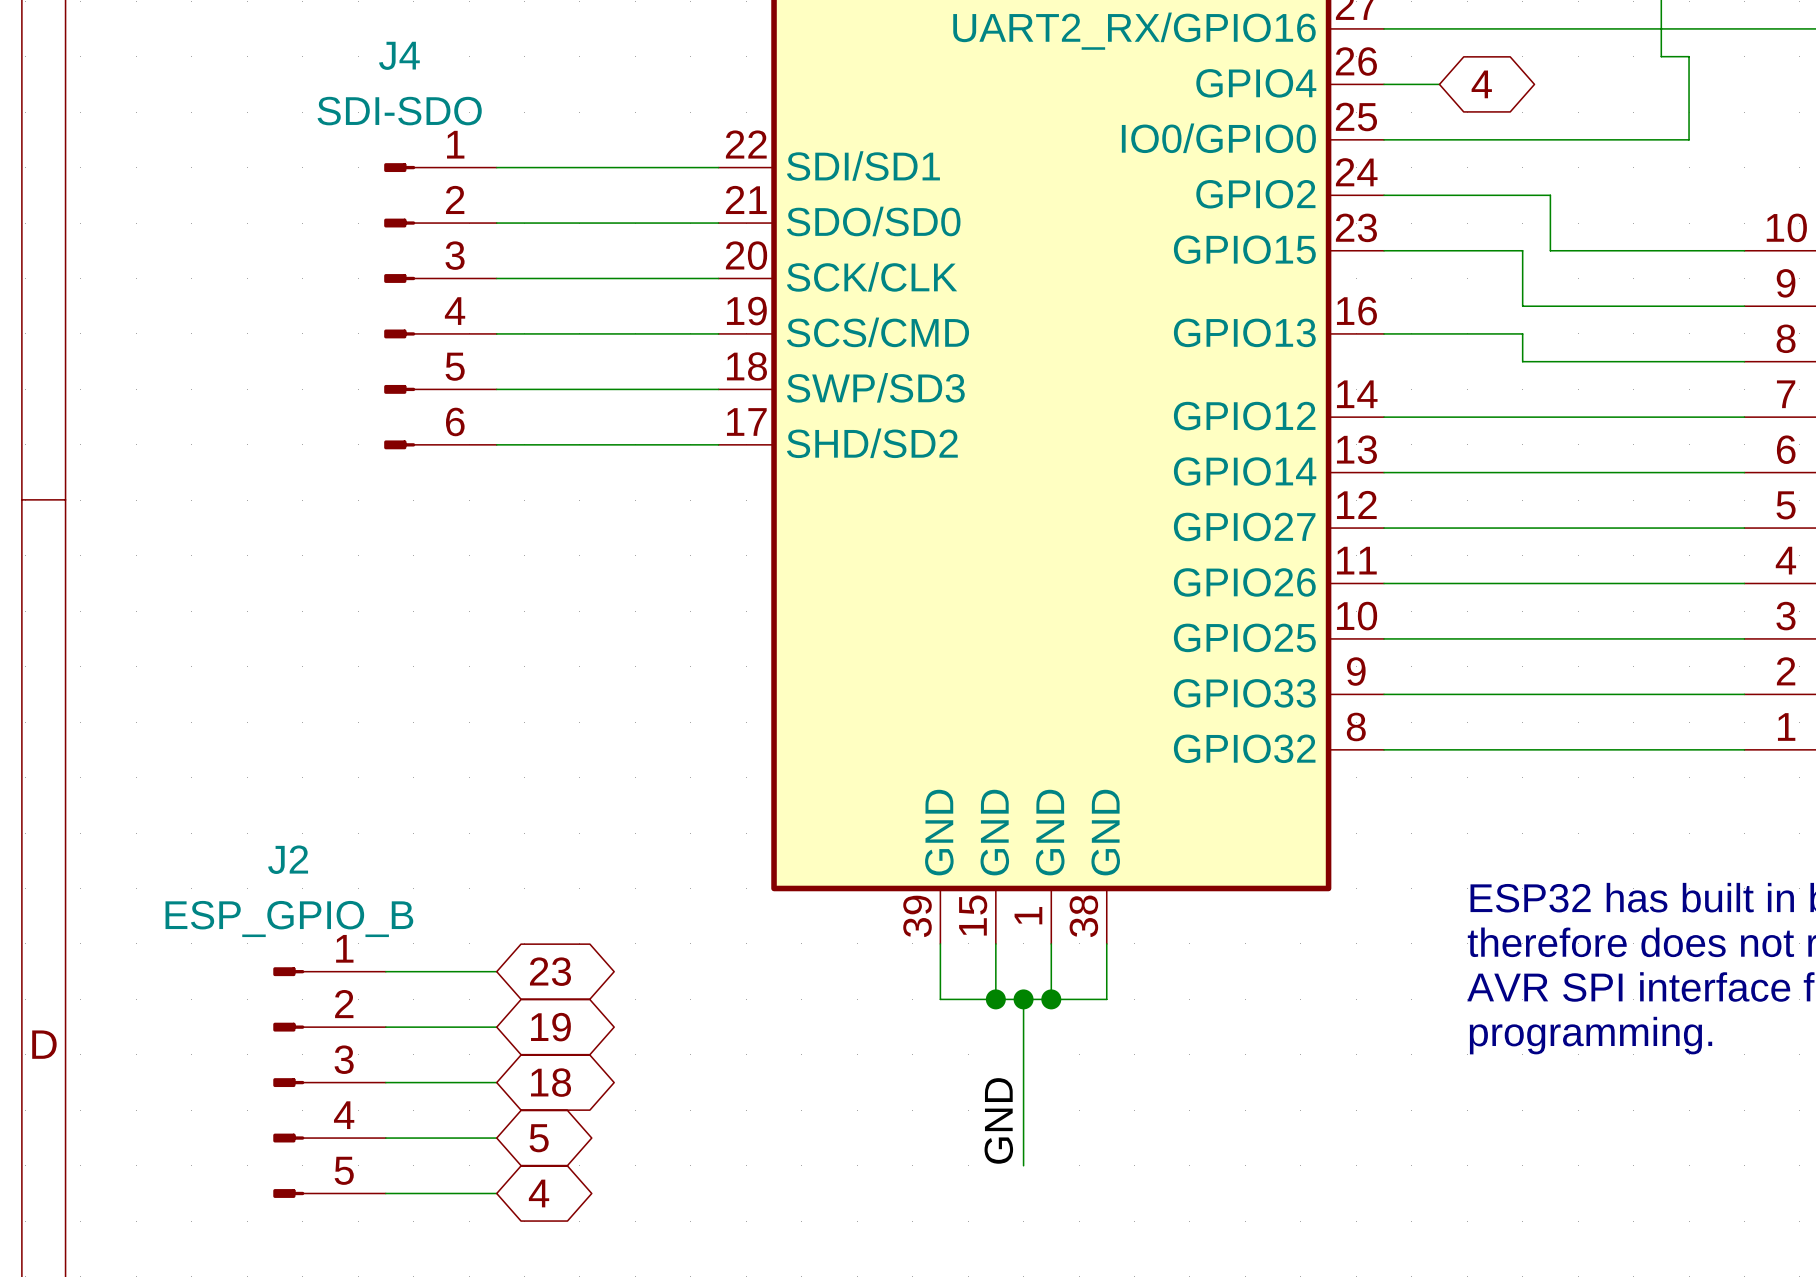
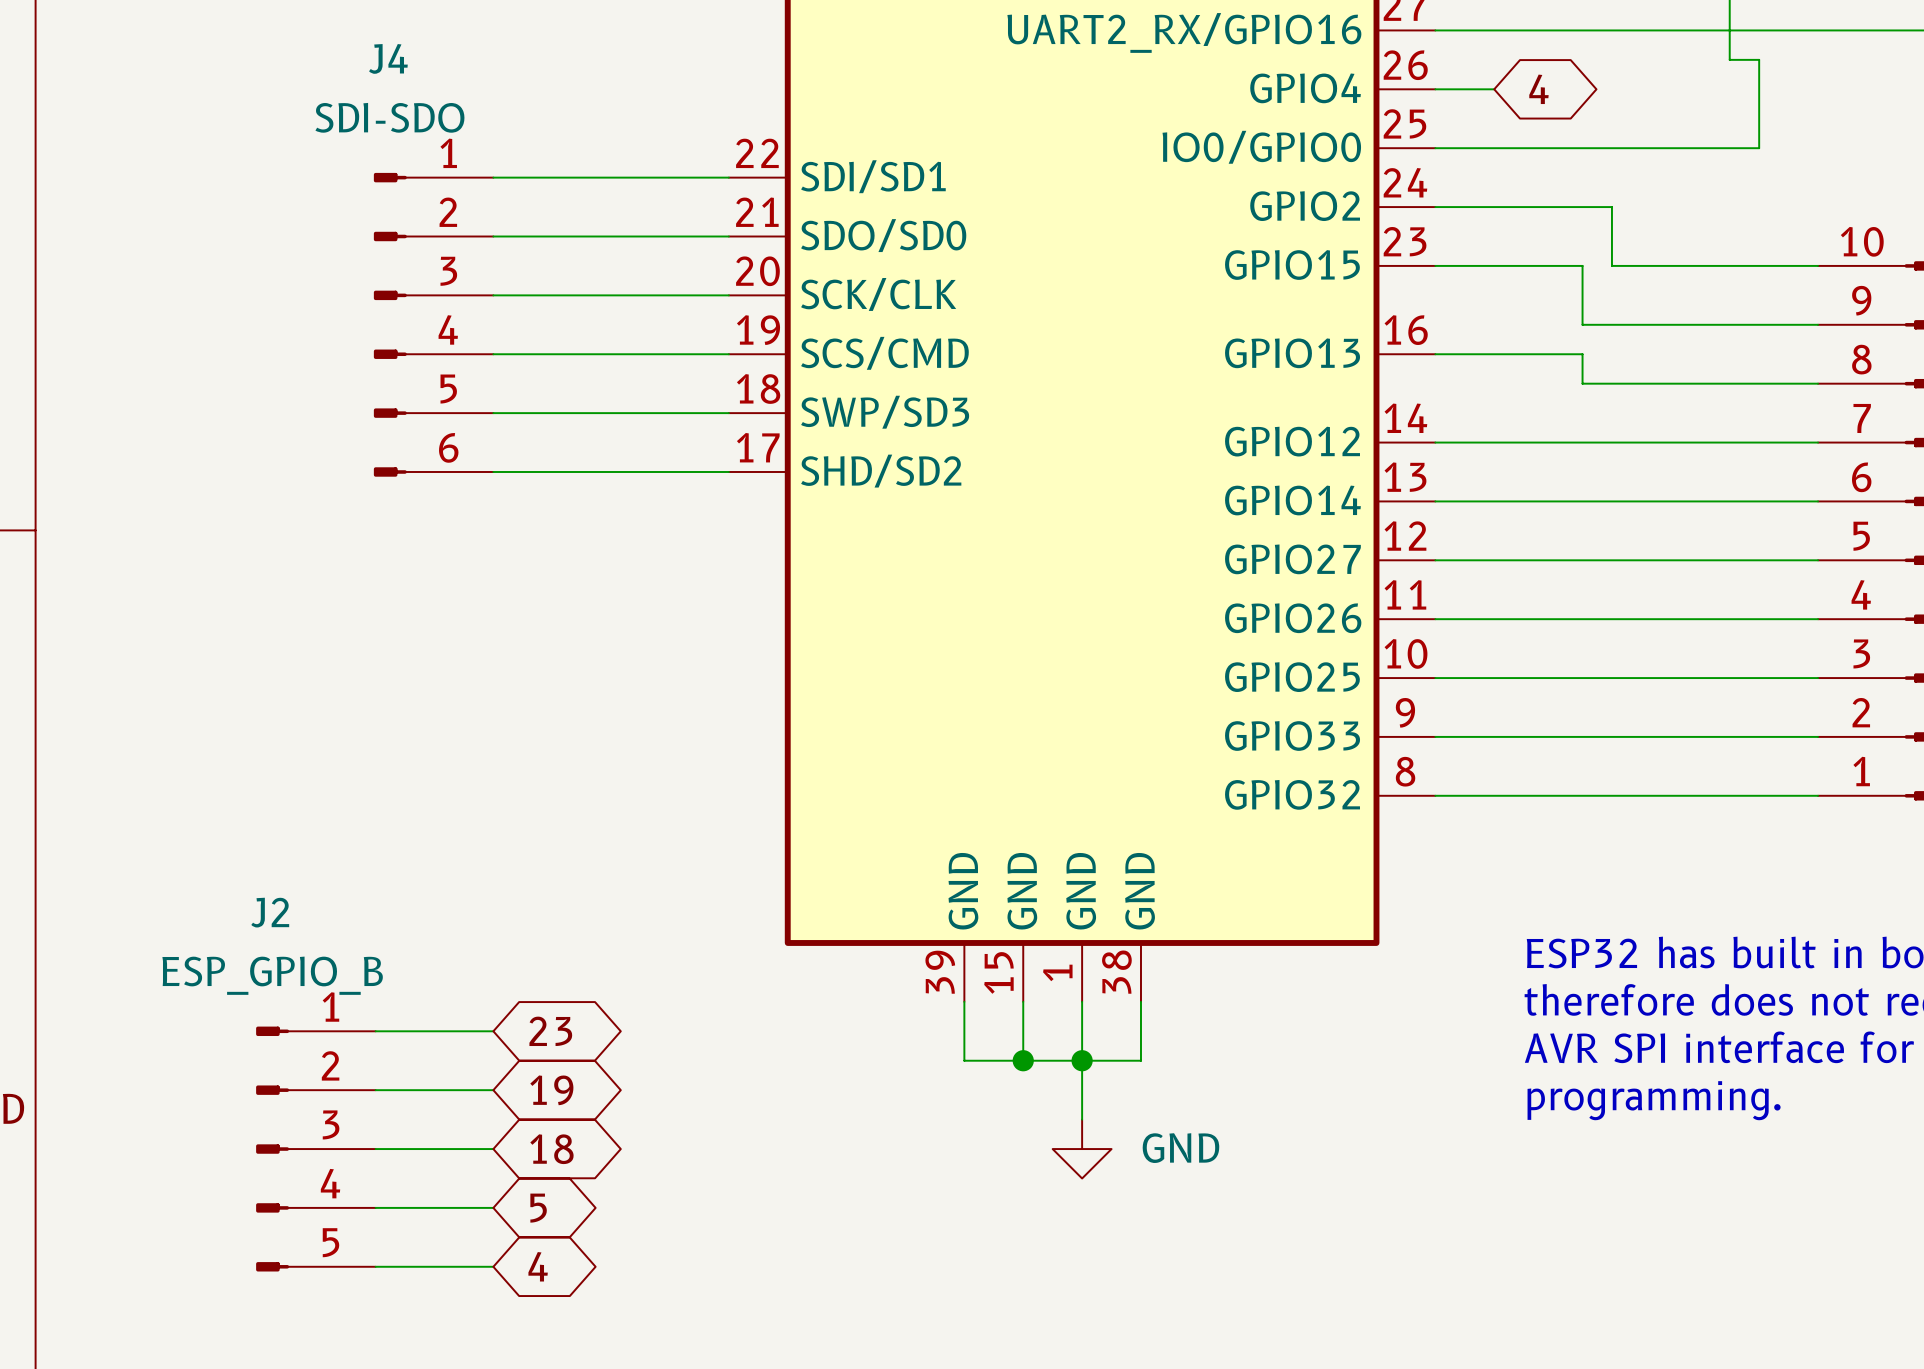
wire: (1023, 999) (1023, 1165) -> none
junction: (1023, 999) -> none
wire: none -> (1082, 1060) (1082, 1119)
power symbol: none -> GND (1082, 1149)
label: GND (998, 1120) -> none

